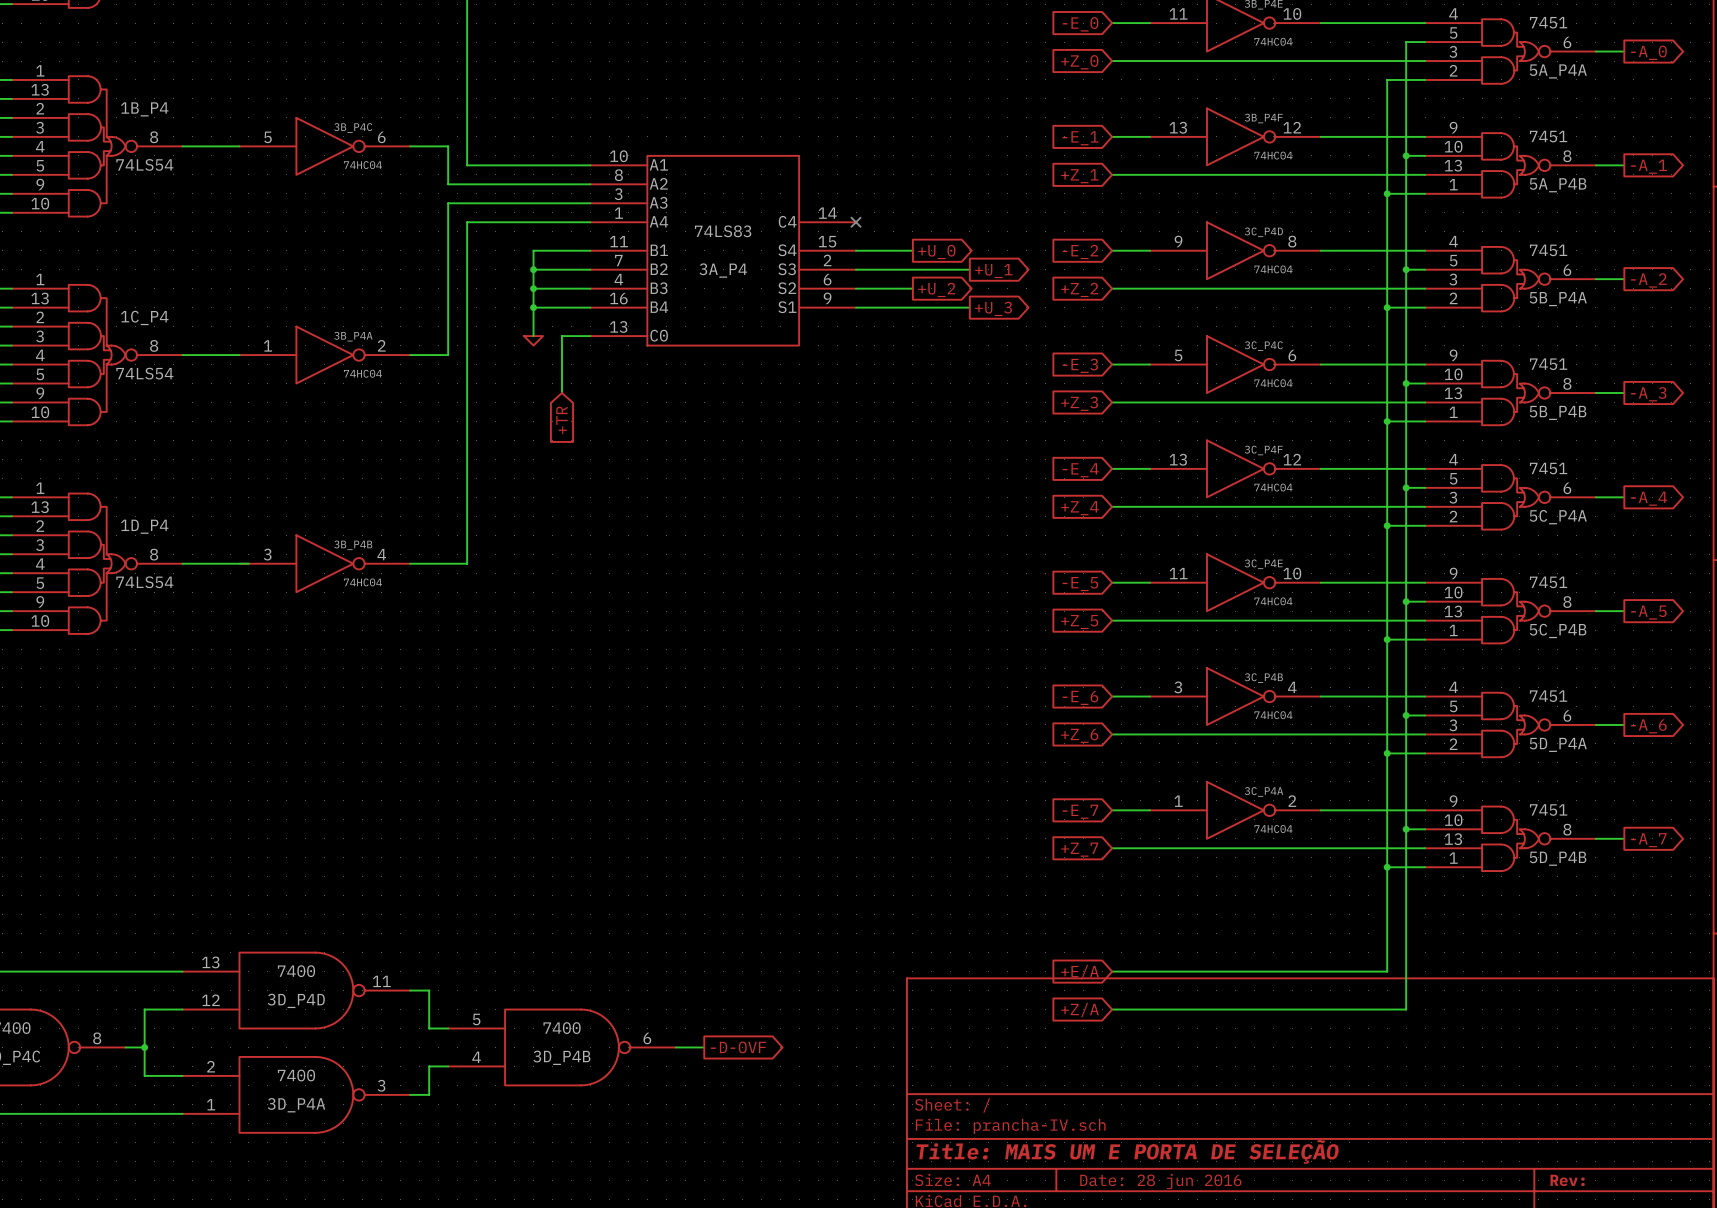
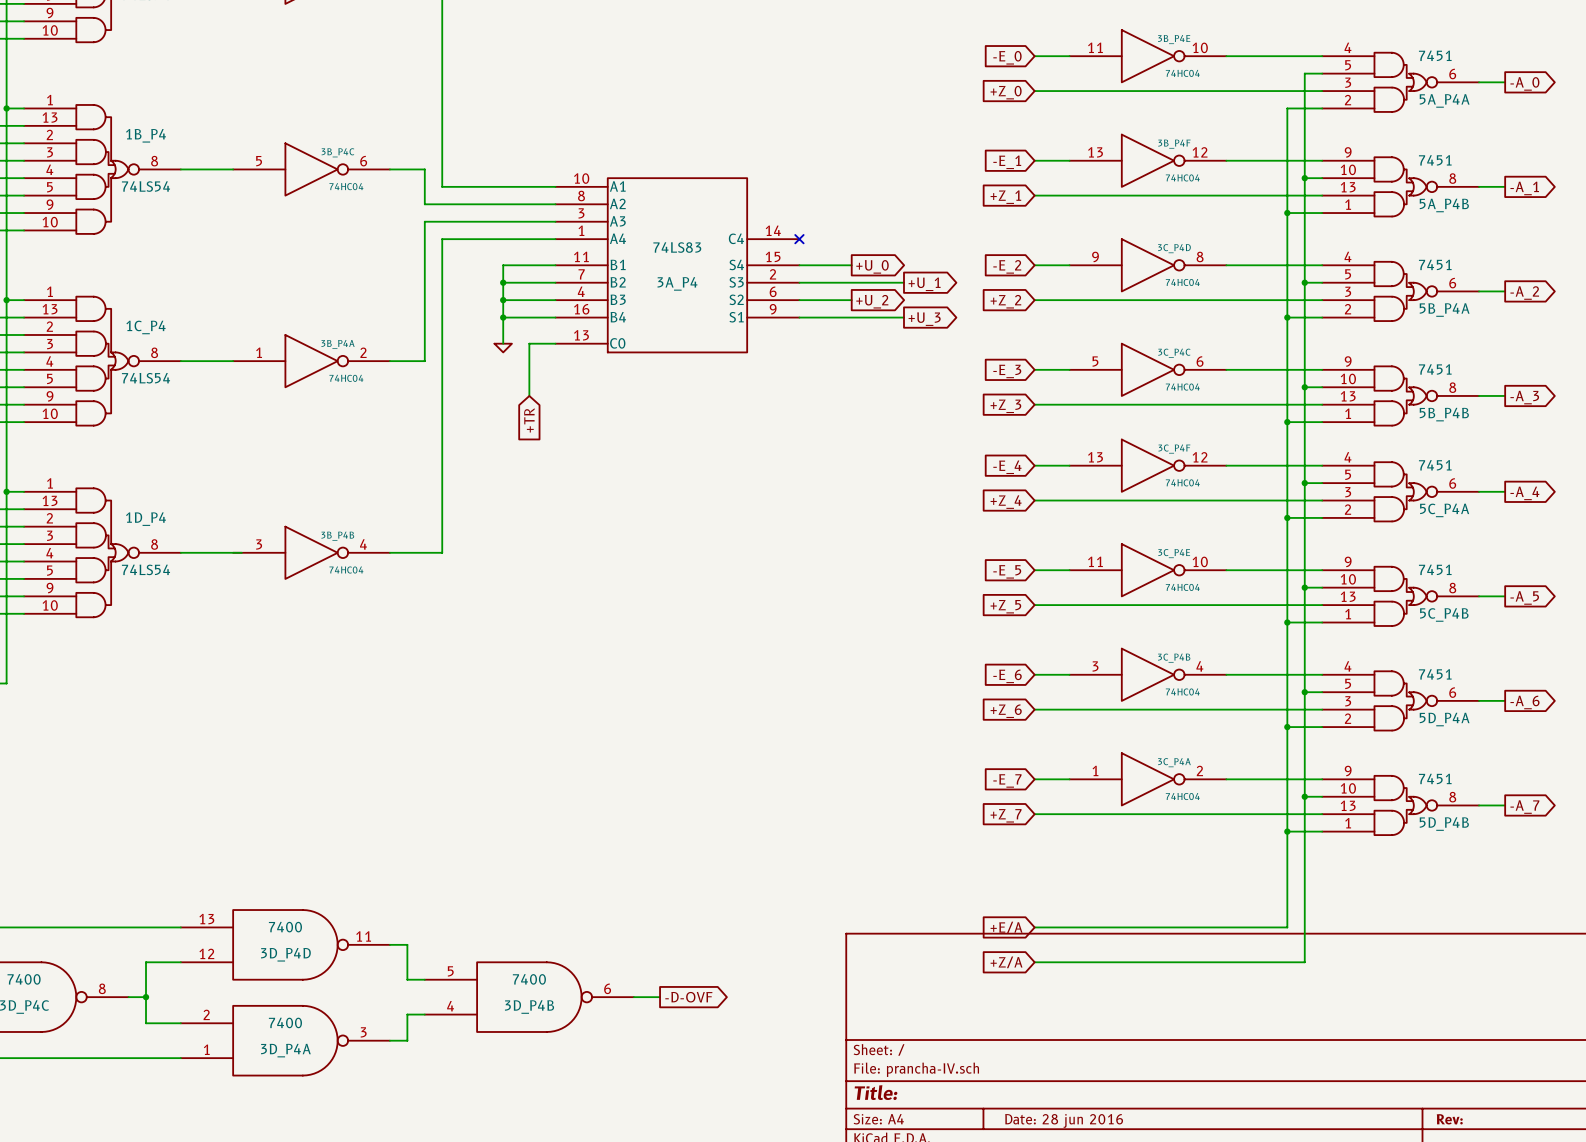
title block: Title: MAIS UM E PORTA DE SELEÇÃO (1127, 1151) -> Title: (876, 1092)

